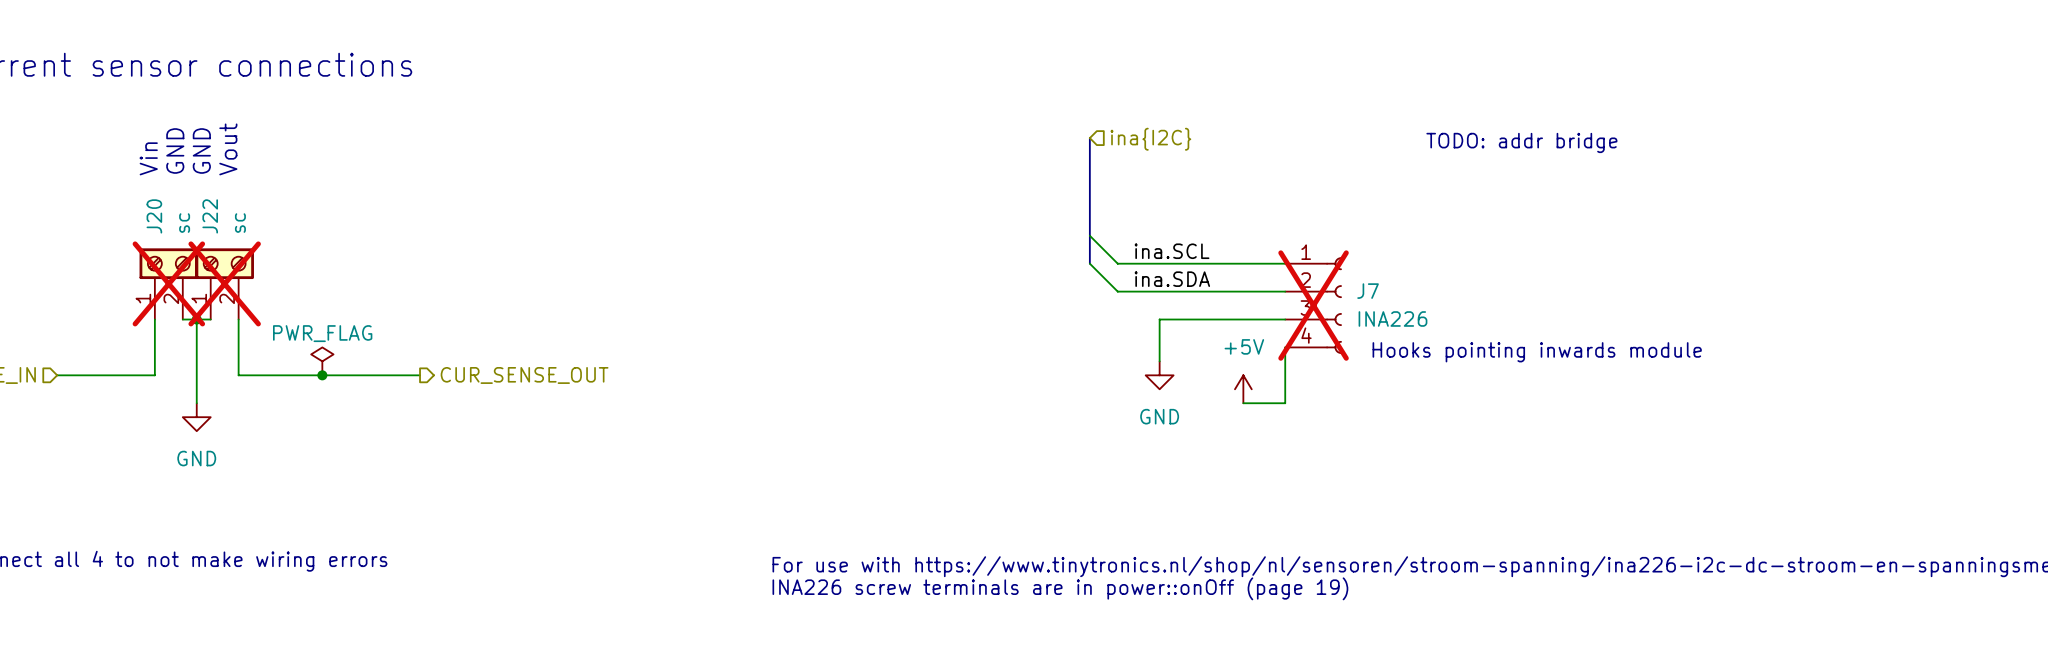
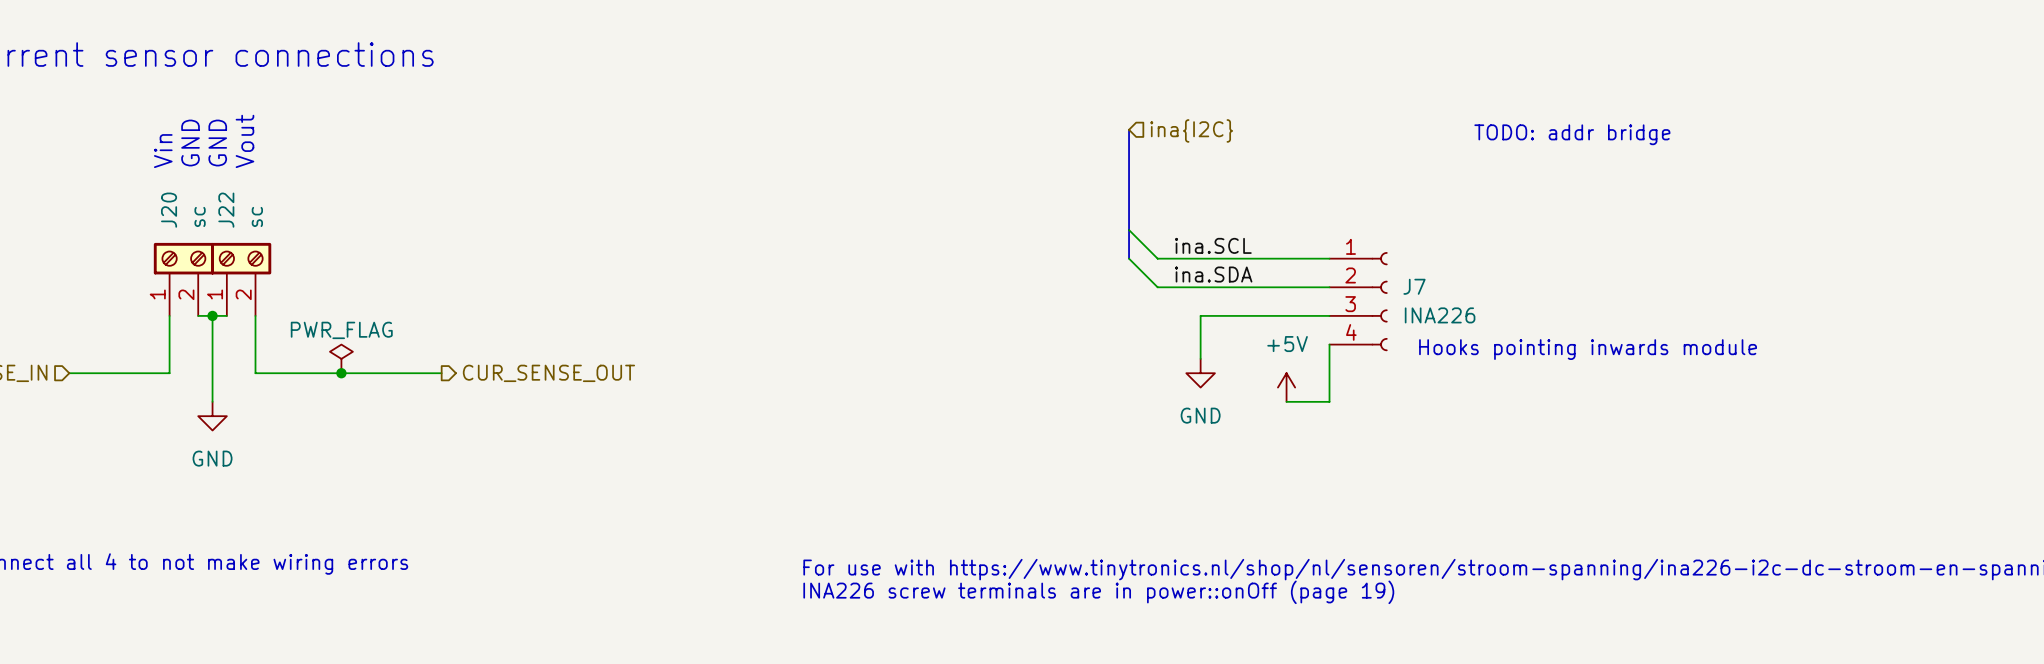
J20 do-not-place cross: (168, 283) -> none
J22 do-not-place cross: (224, 283) -> none
J7 do-not-place cross: (1313, 305) -> none

